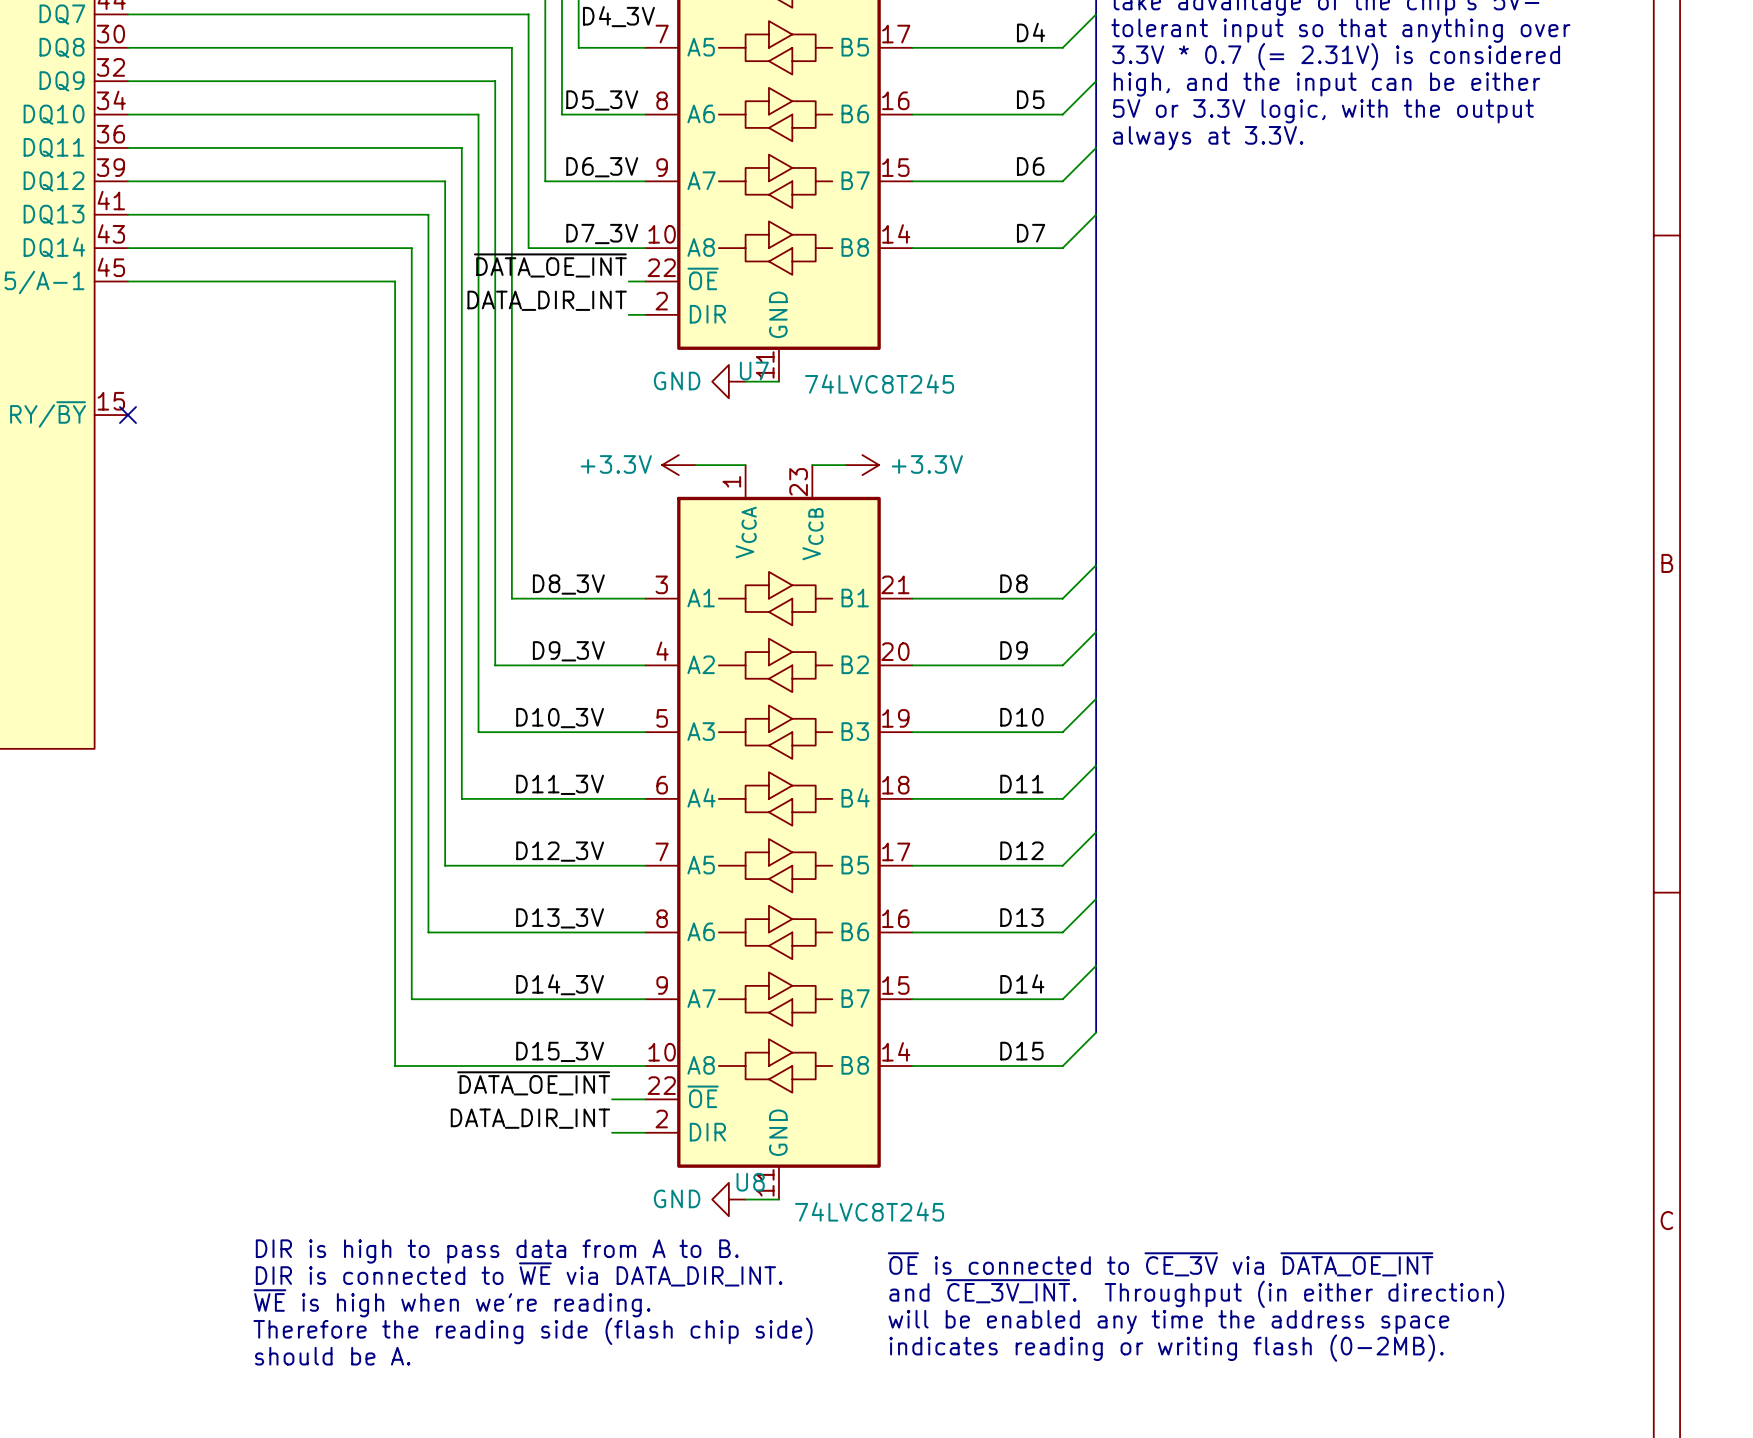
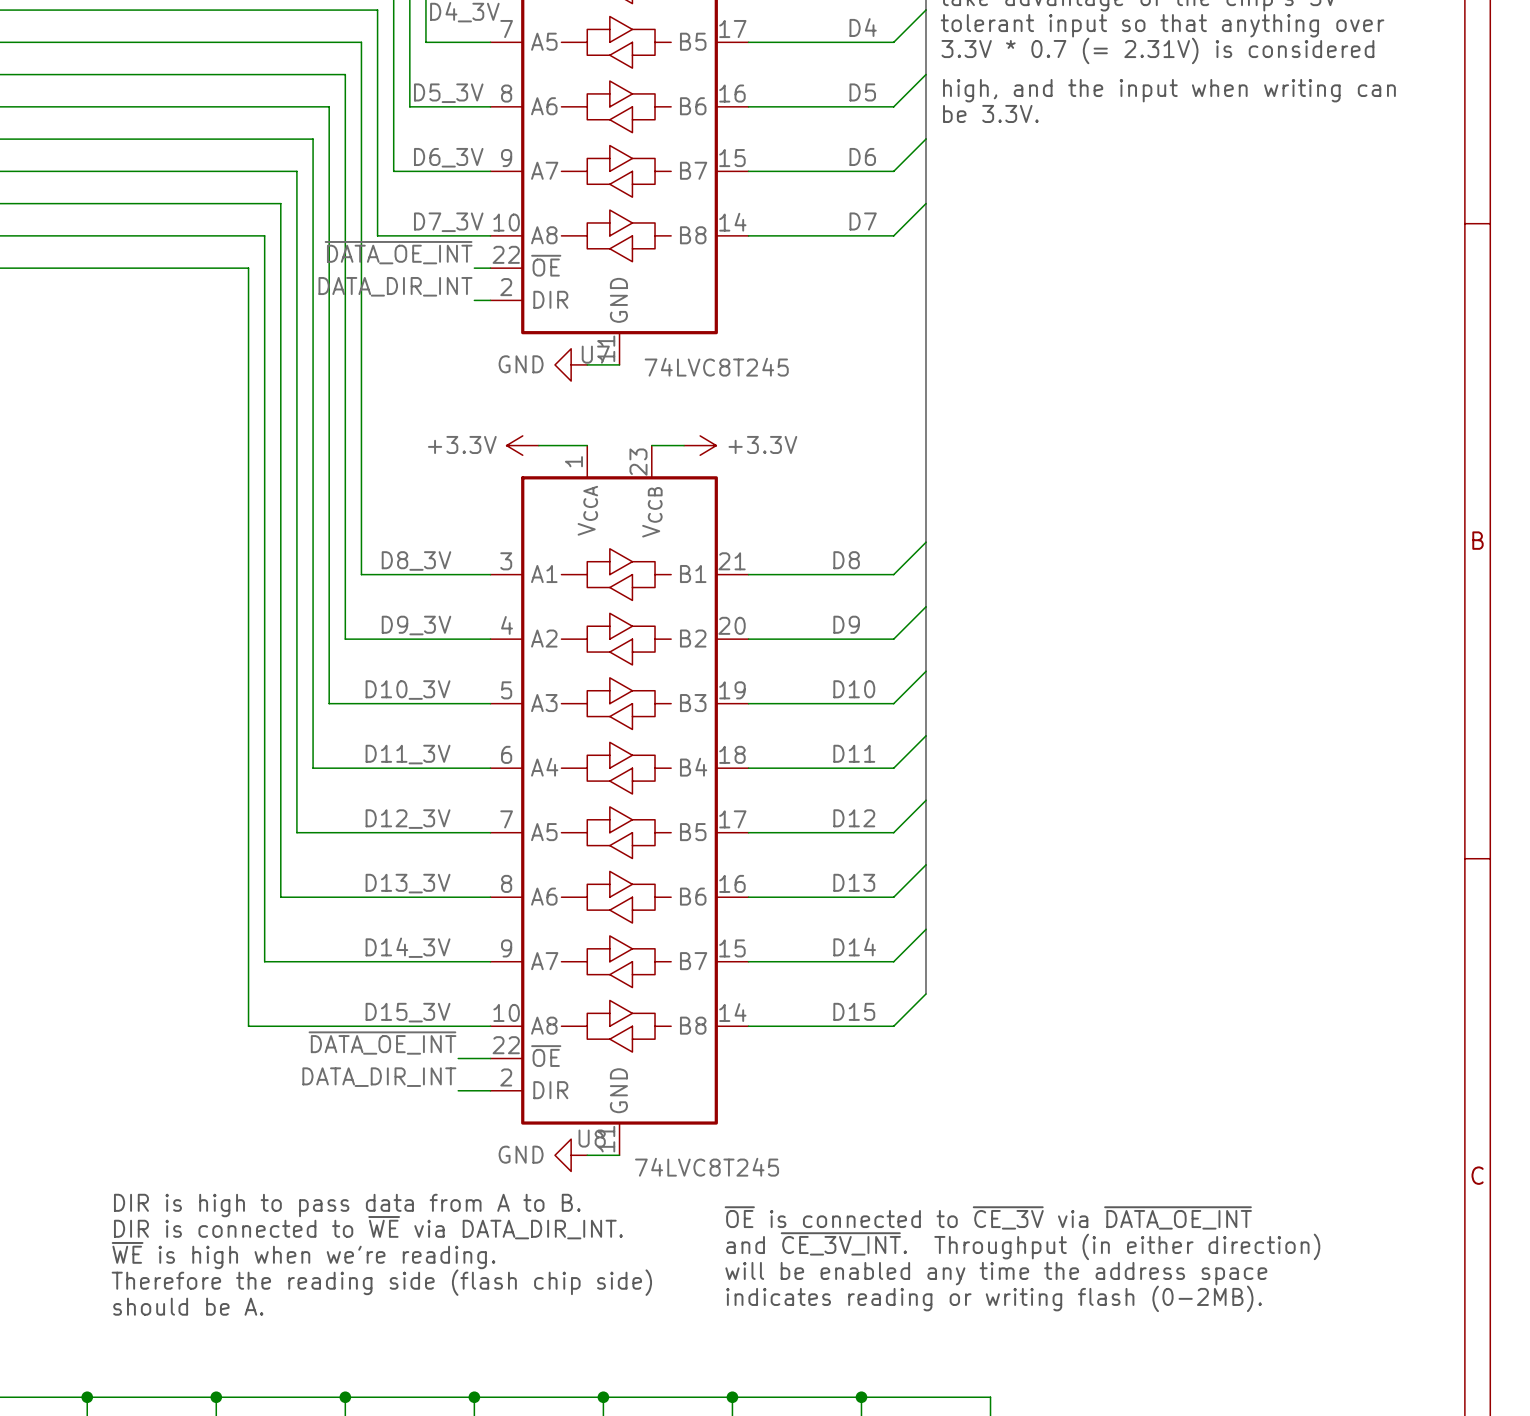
text: high, and the input can be either (1326, 84) -> high, and the input when writing can (1169, 90)
text: 5V or 3.3V logic, with the output (1323, 111) -> none
text: none -> be 3.3V. (990, 113)
text: always at 3.3V. (1208, 138) -> none

